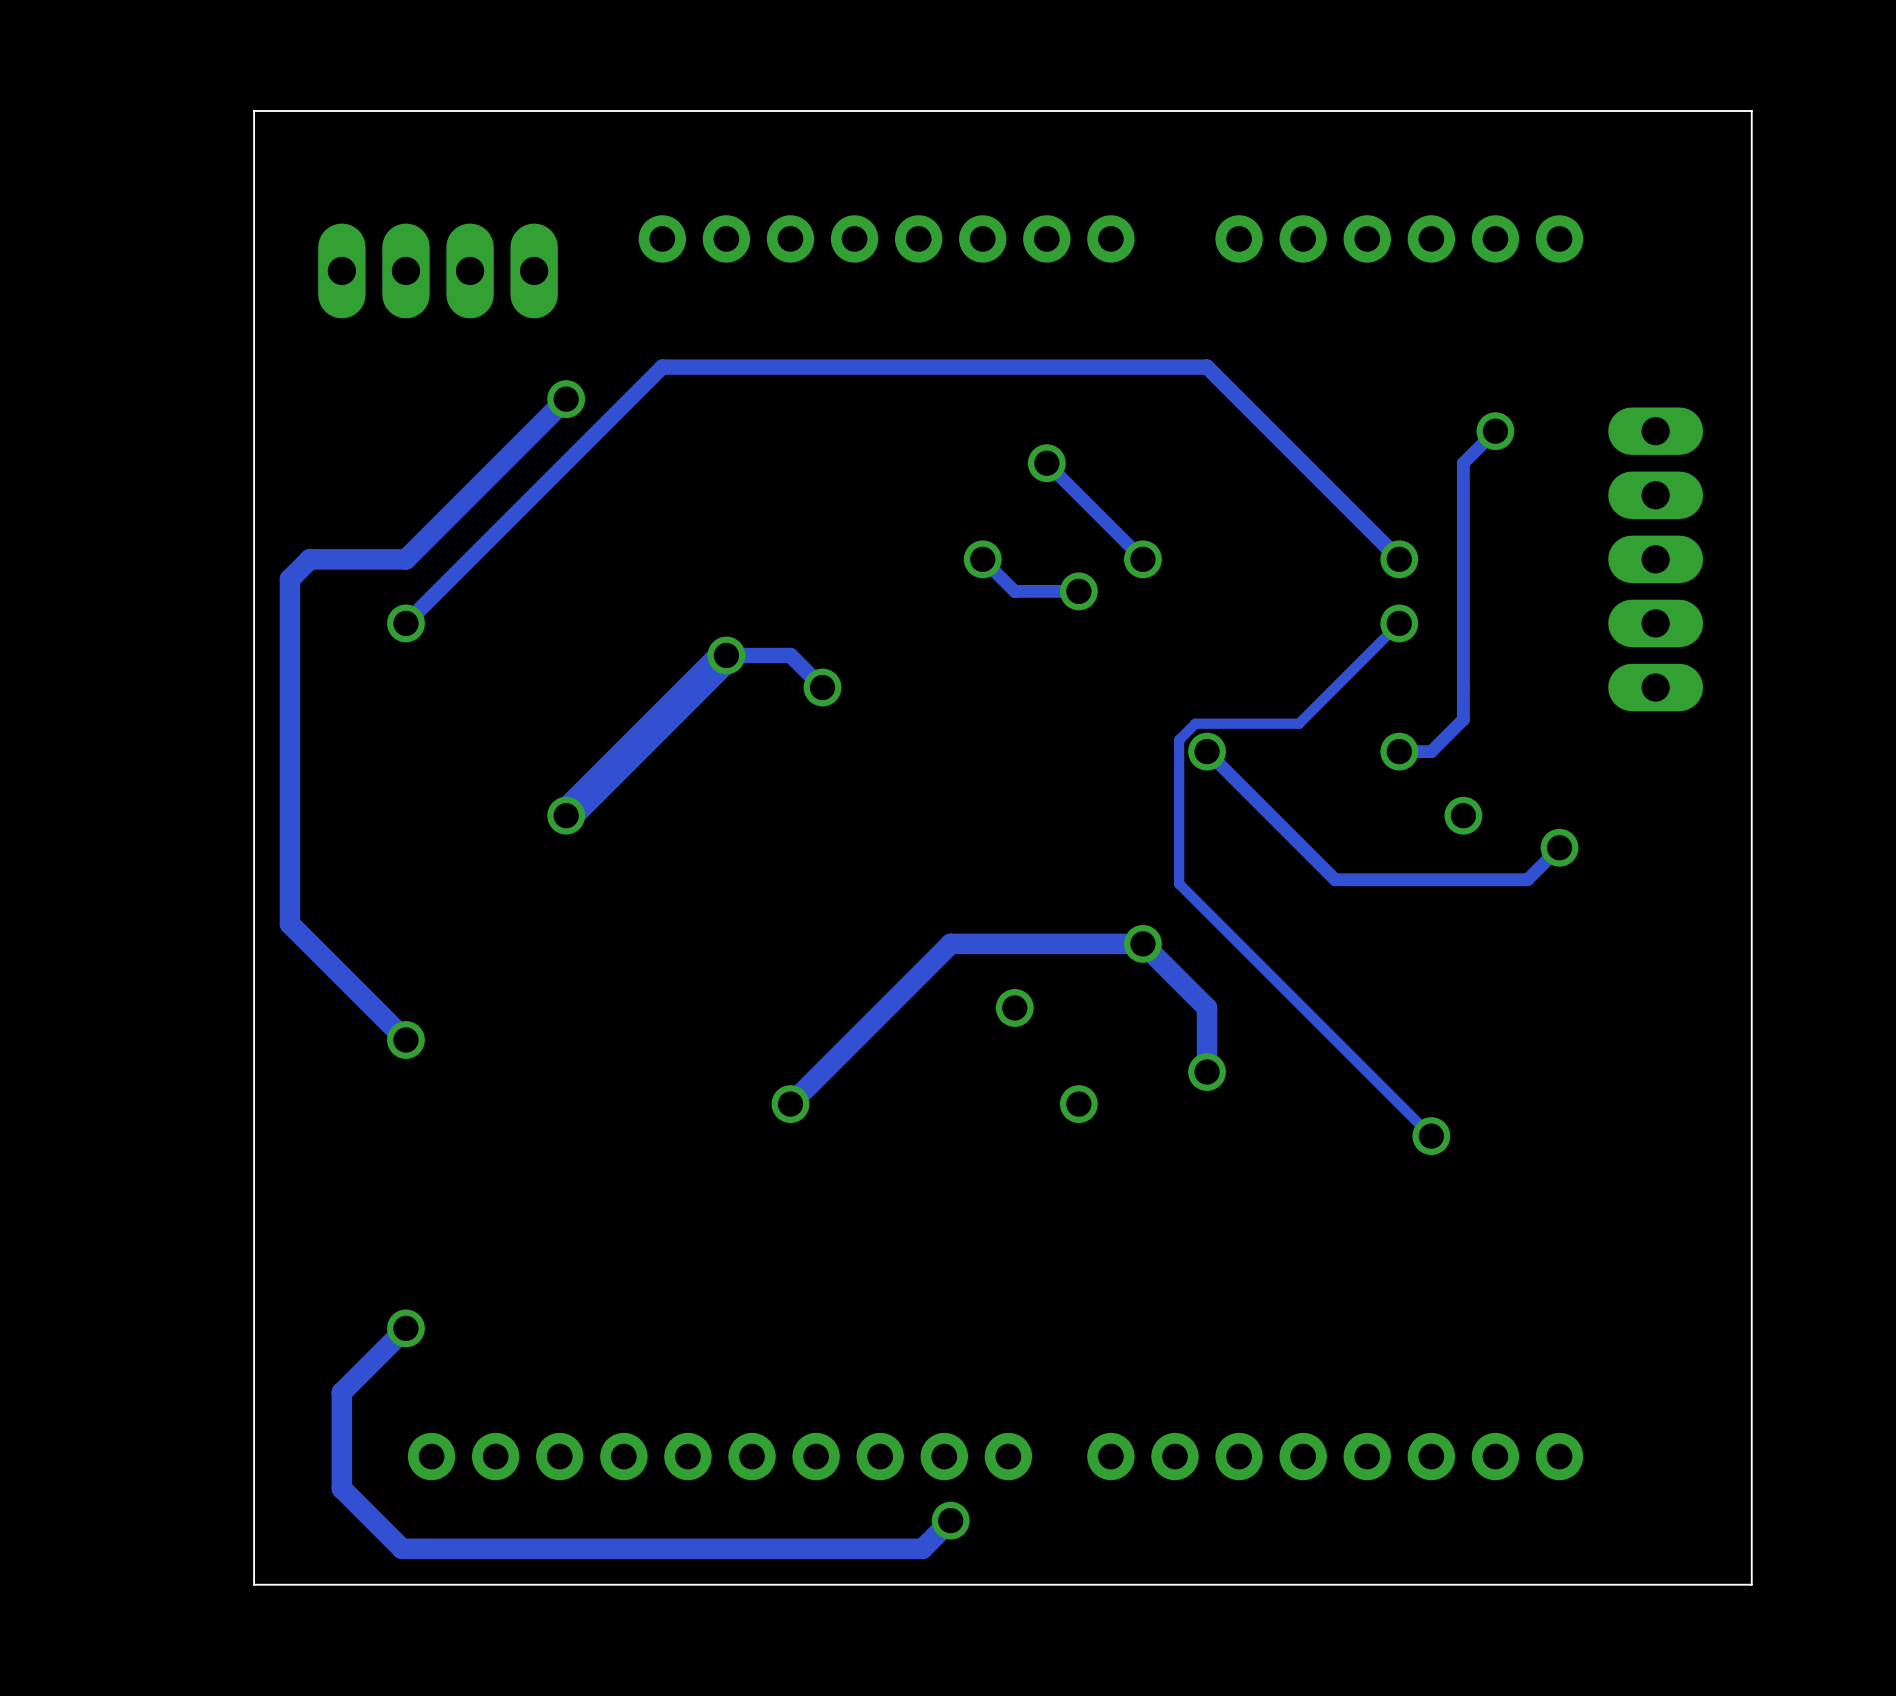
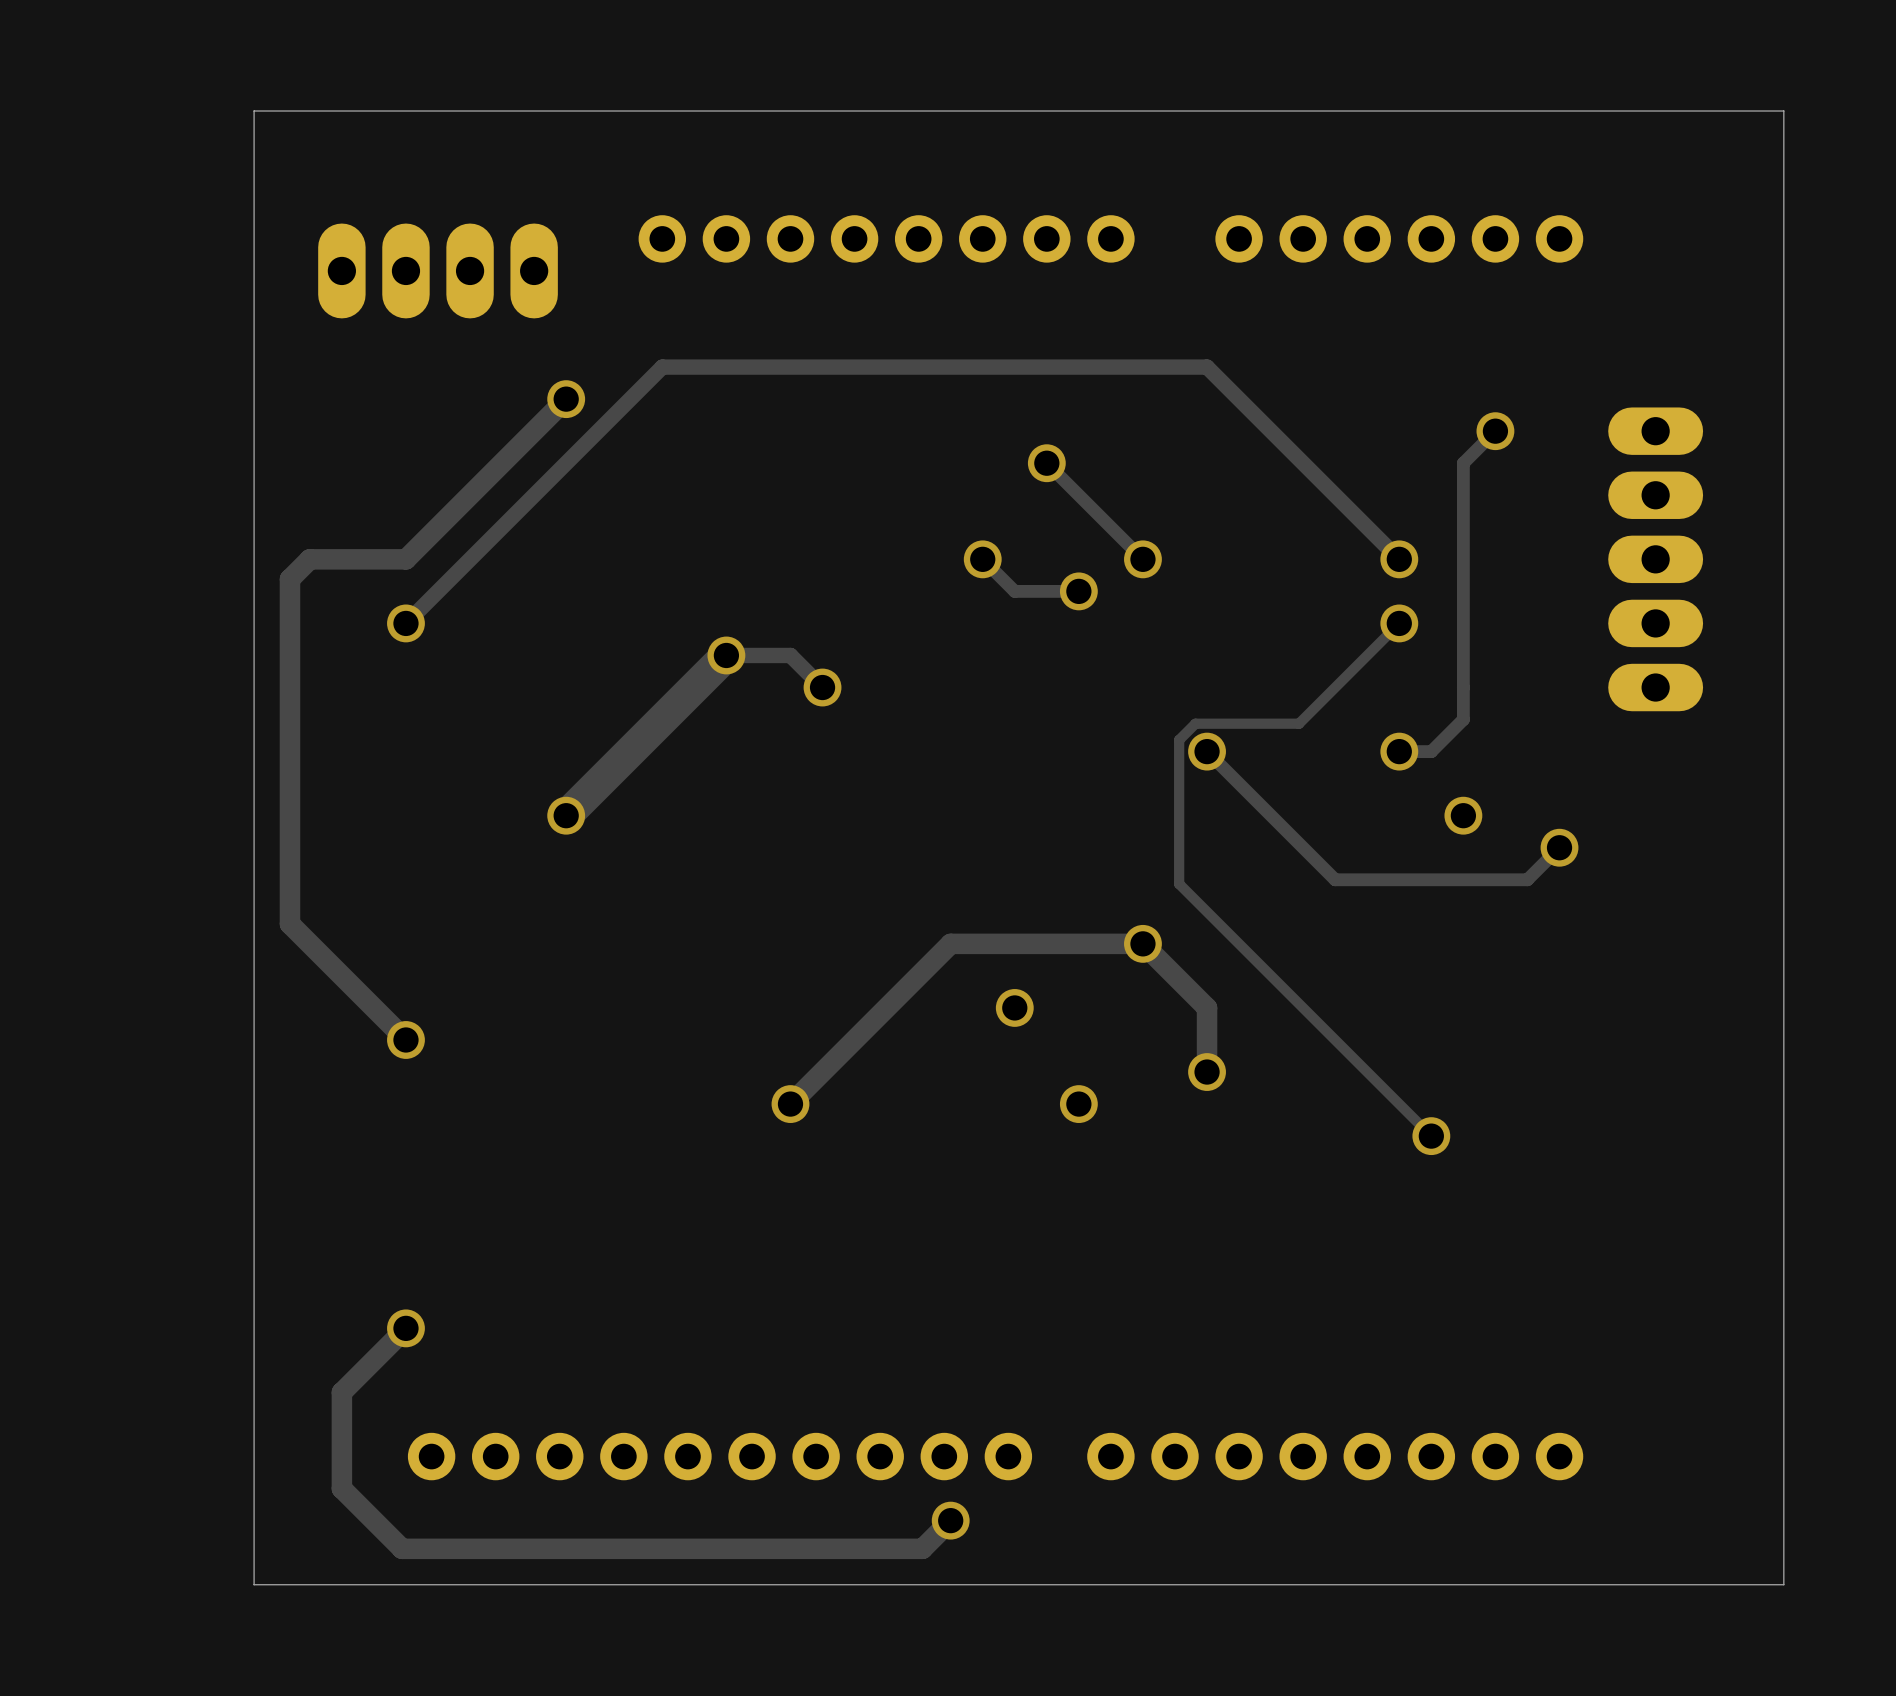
board edge: (1751, 111) (1751, 1584) -> (1751, 111) (1783, 111) (1783, 1584) (1751, 1584)

